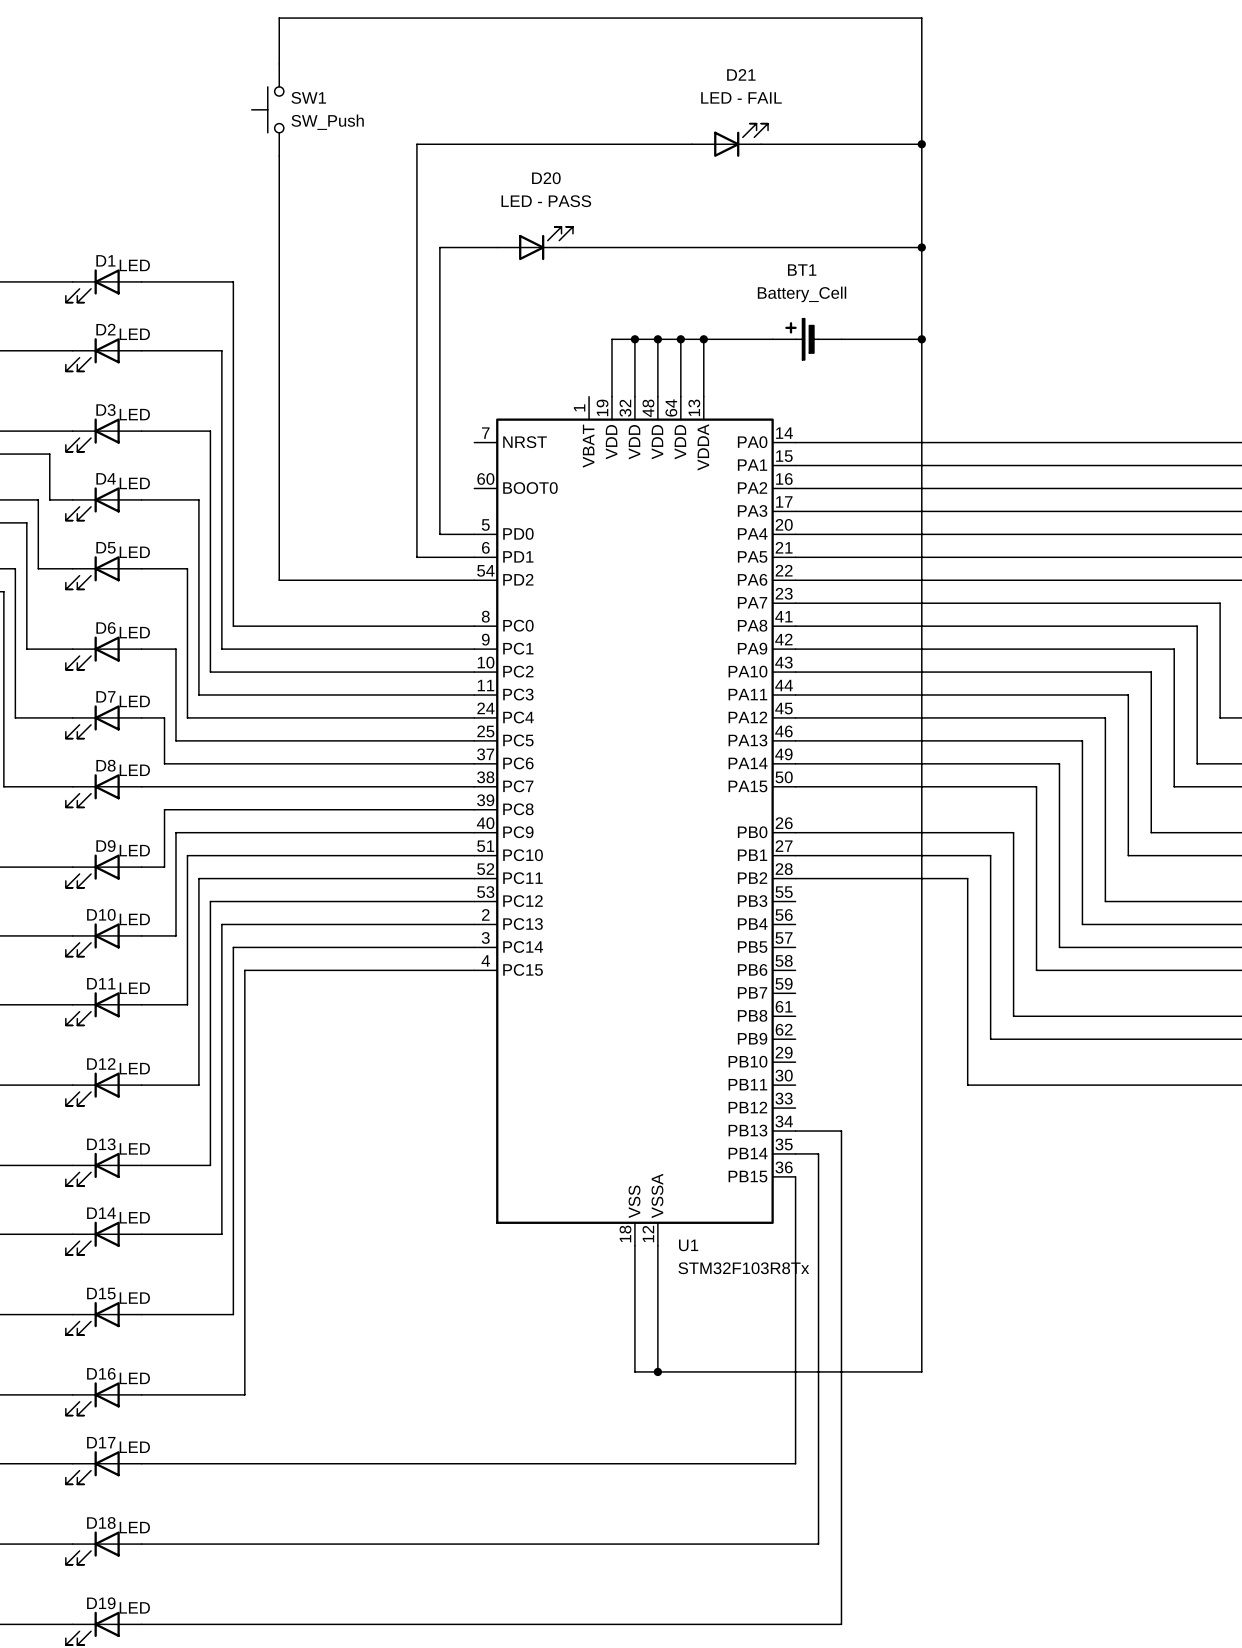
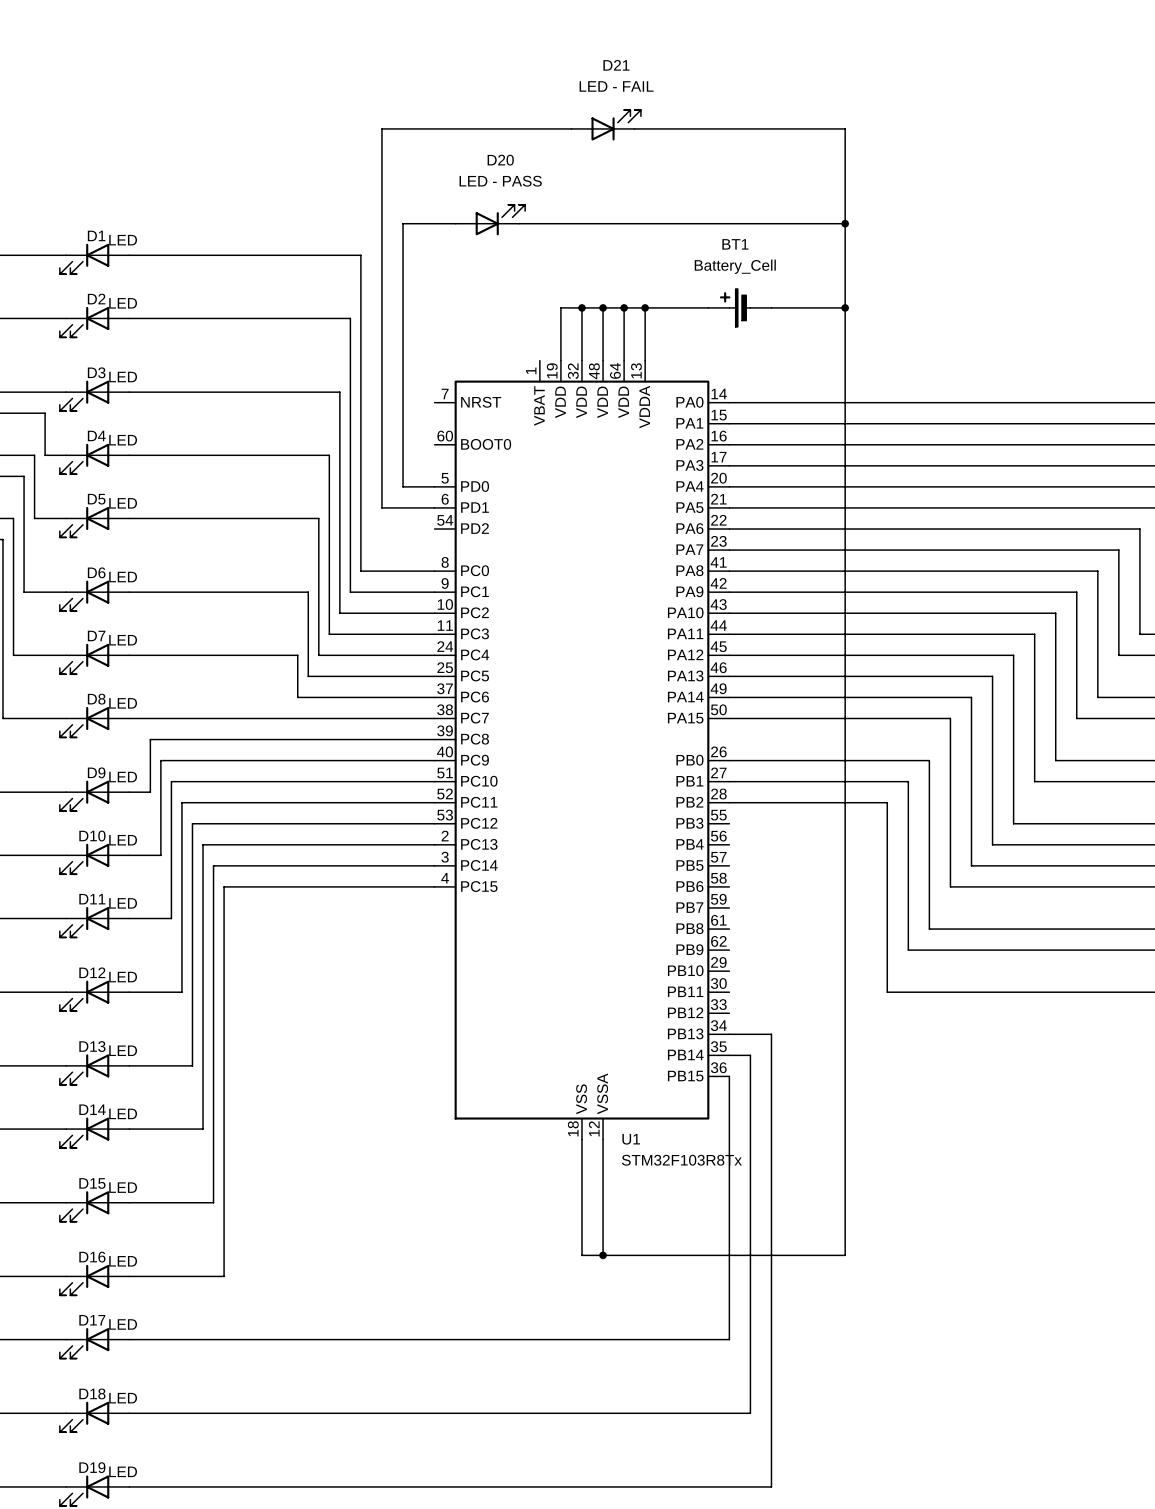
wire: (279, 63) (279, 18) (921, 18) (921, 144) -> none
SW1: SW_Push (267, 109) -> none
D21 position: (730, 140) -> (606, 125)
junction: (921, 144) -> none
wire: (279, 155) (279, 580) (474, 580) -> none
wire: (233, 281) (233, 626) (393, 626) -> (213, 255) (360, 255) (360, 571)
wire: (221, 350) (221, 649) -> (203, 318) (350, 318) (350, 592)
wire: (210, 431) (210, 672) (371, 672) -> (192, 392) (339, 392) (339, 613)
wire: (198, 499) (198, 695) (359, 695) -> (181, 455) (329, 455) (329, 634)
wire: (187, 568) (187, 717) -> (171, 518) (318, 518) (318, 655)
wire: (175, 649) (175, 740) (336, 740) -> (160, 592) (203, 592)
wire: (336, 649) (382, 649) -> (308, 592) (308, 676)
wire: (164, 717) (164, 763) (325, 763) -> (150, 655) (171, 655)
wire: (325, 717) (348, 717) -> (297, 655) (297, 697)

